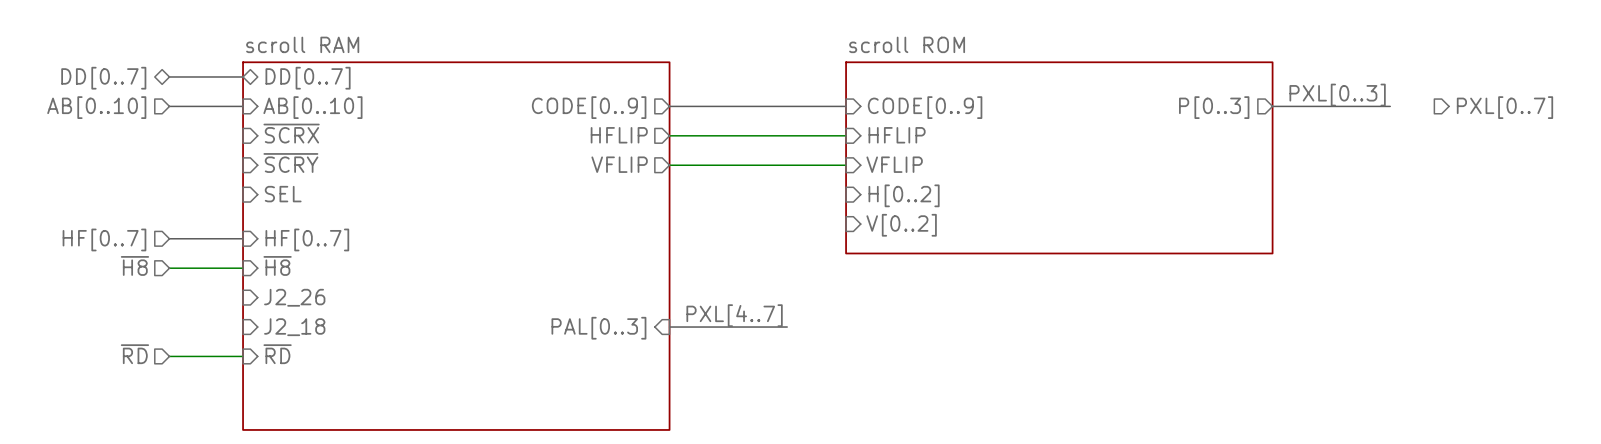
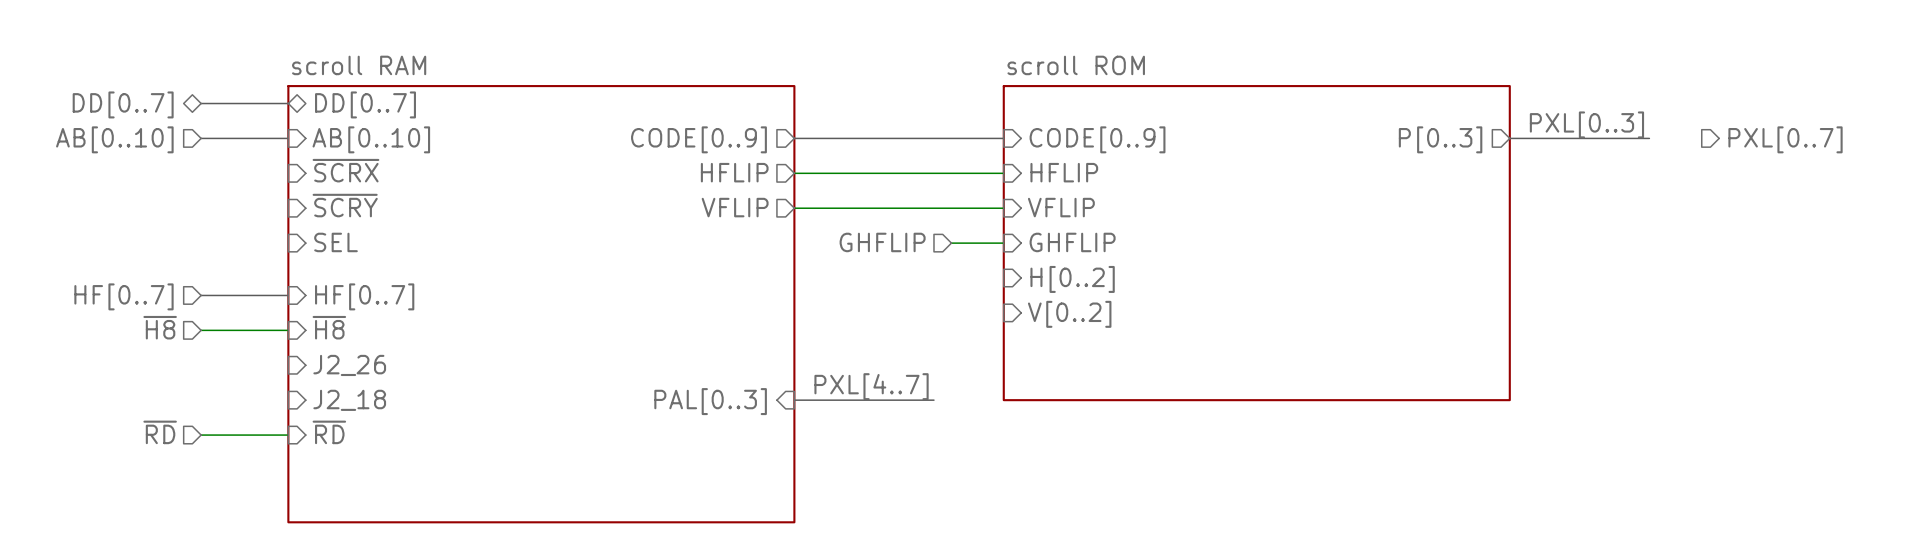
sheet scroll ROM: (1059, 157) -> none
hierarchical label: none -> GHFLIP (882, 242)
wire: none -> (951, 243) (1003, 243)
sheet scroll ROM: none -> (1256, 243)
sheet pin: H[0..2] (904, 195) -> GHFLIP (1072, 242)
sheet pin: V[0..2] (901, 225) -> H[0..2] (1072, 279)
sheet pin: none -> V[0..2] (1069, 314)

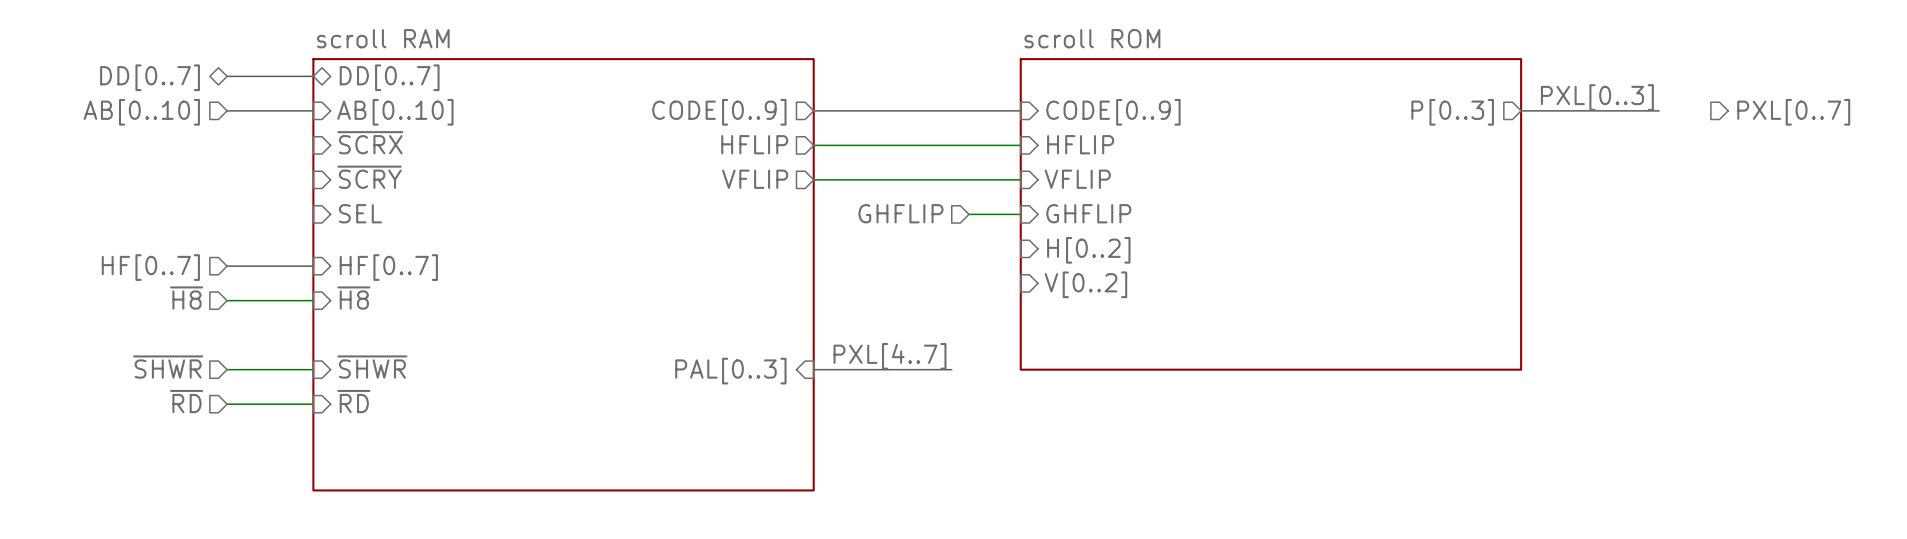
sheet pin: J2_26 (349, 365) -> none
hierarchical label: none -> ~{SHWR} (168, 367)
wire: none -> (227, 369) (313, 369)
sheet pin: J2_18 (349, 400) -> ~{SHWR} (372, 367)

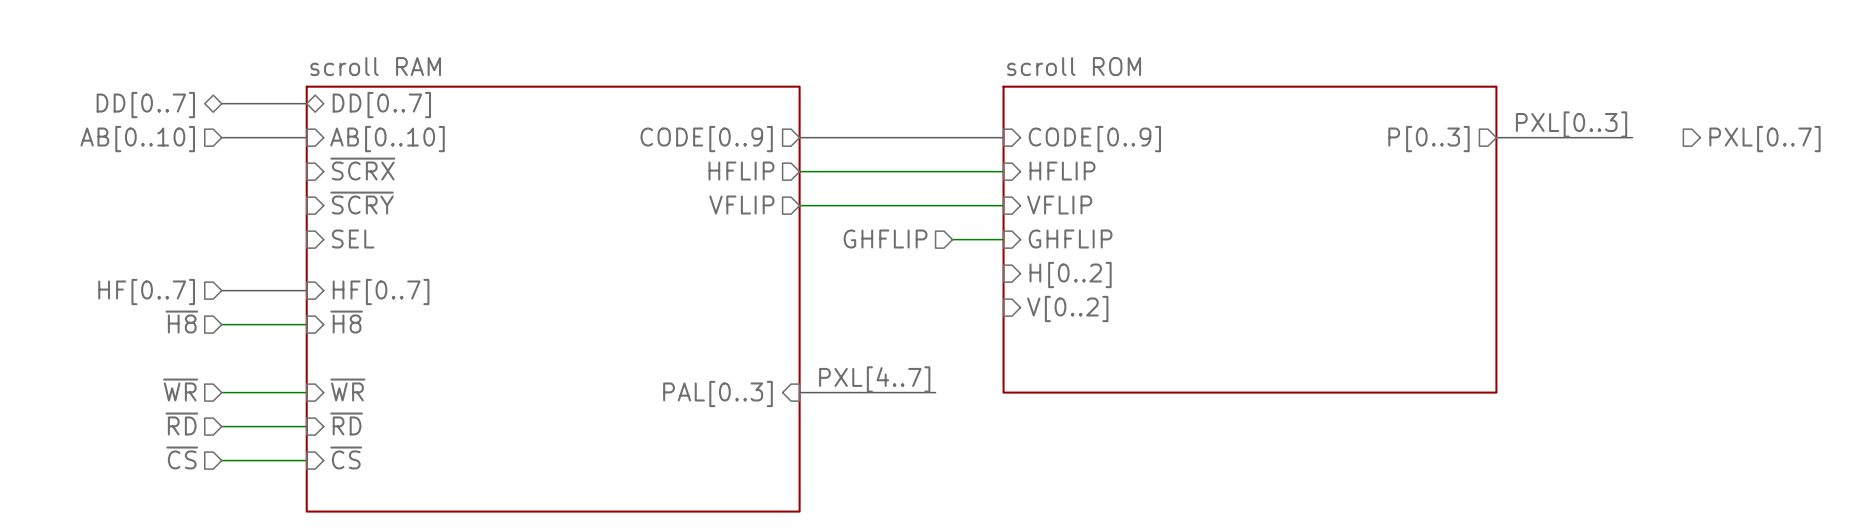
hierarchical label: ~{SHWR} (168, 367) -> ~{WR} (180, 390)
sheet pin: ~{SHWR} (372, 367) -> ~{WR} (347, 390)
hierarchical label: none -> ~{CS} (182, 457)
sheet pin: none -> ~{CS} (346, 457)
wire: none -> (221, 460) (306, 460)

